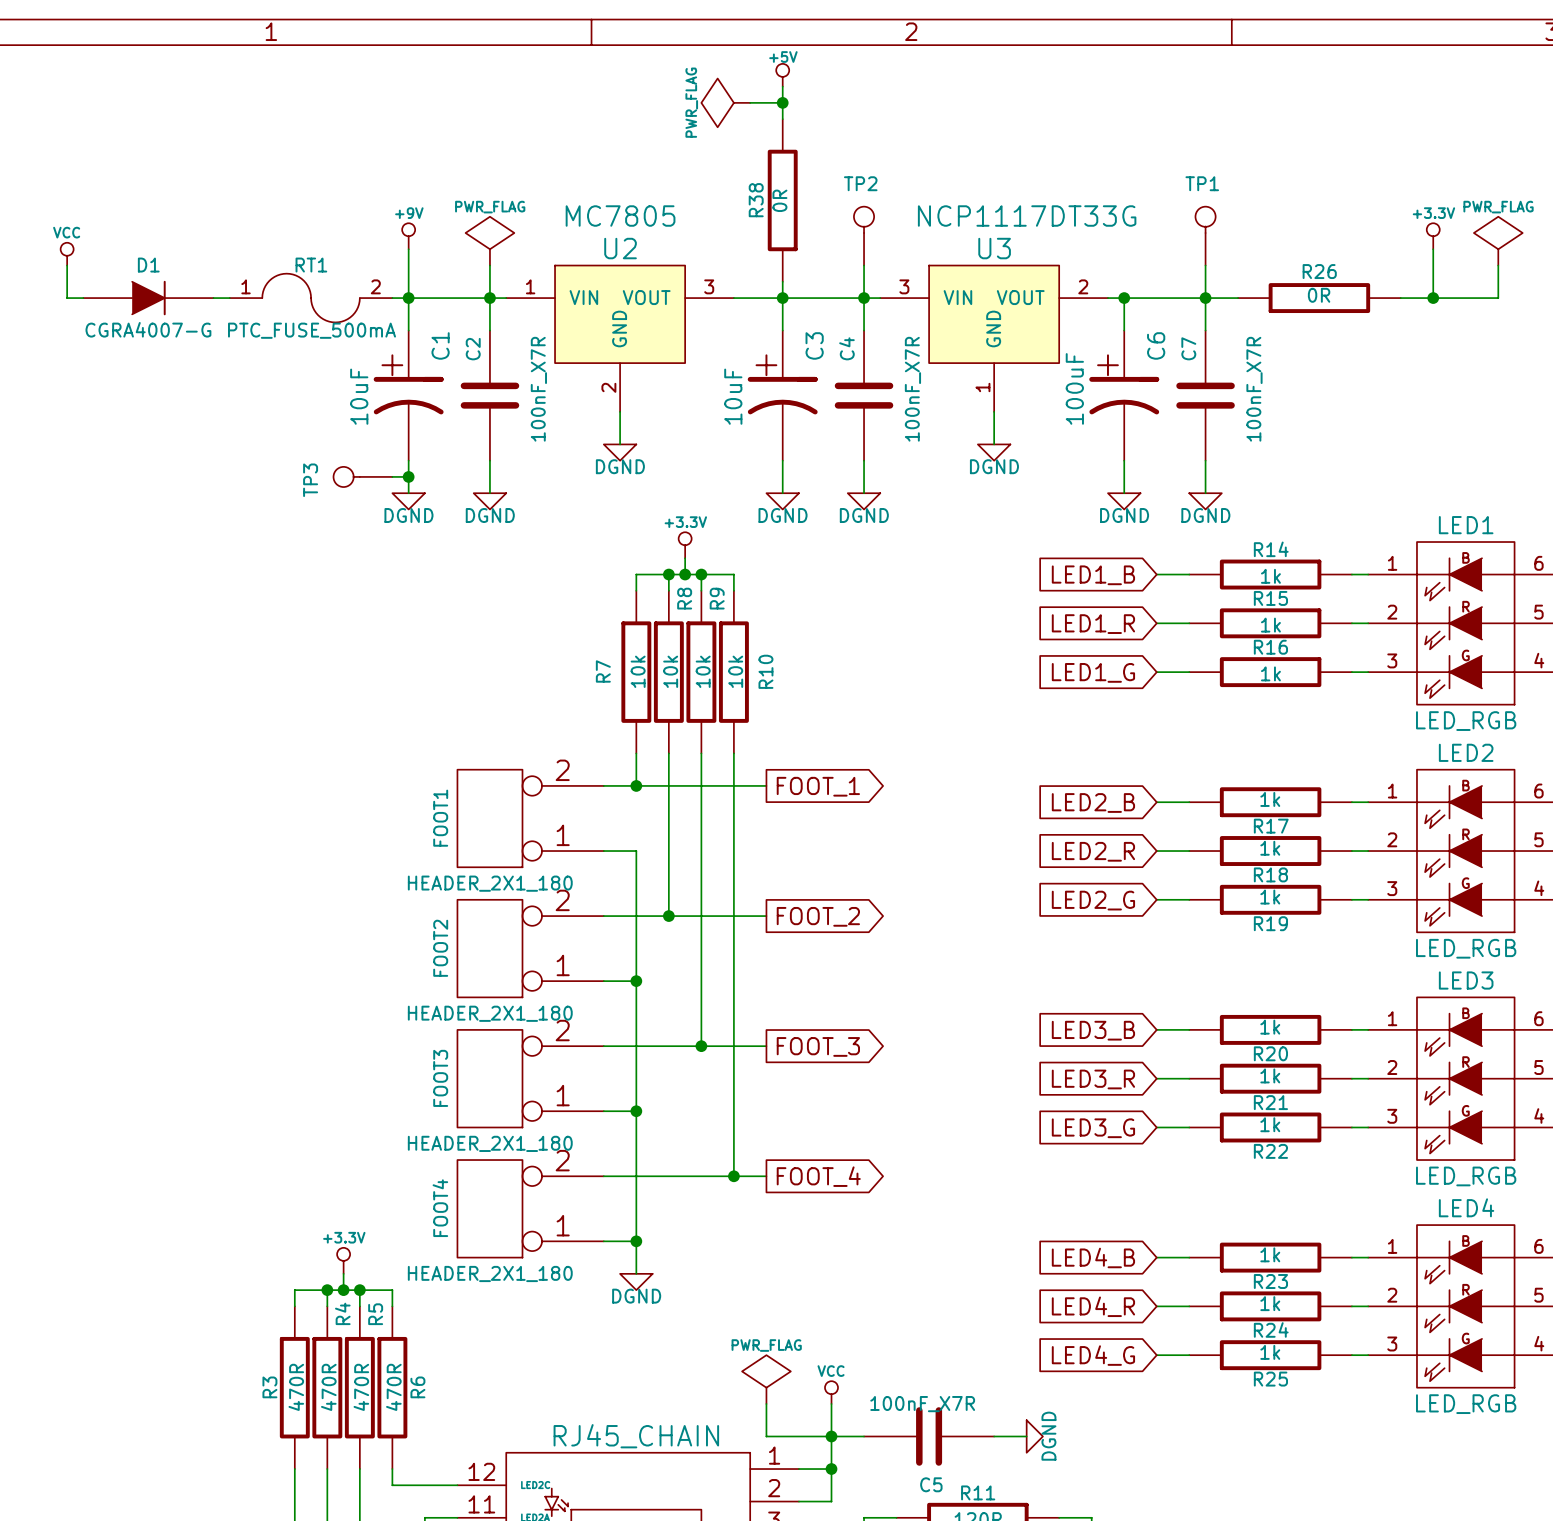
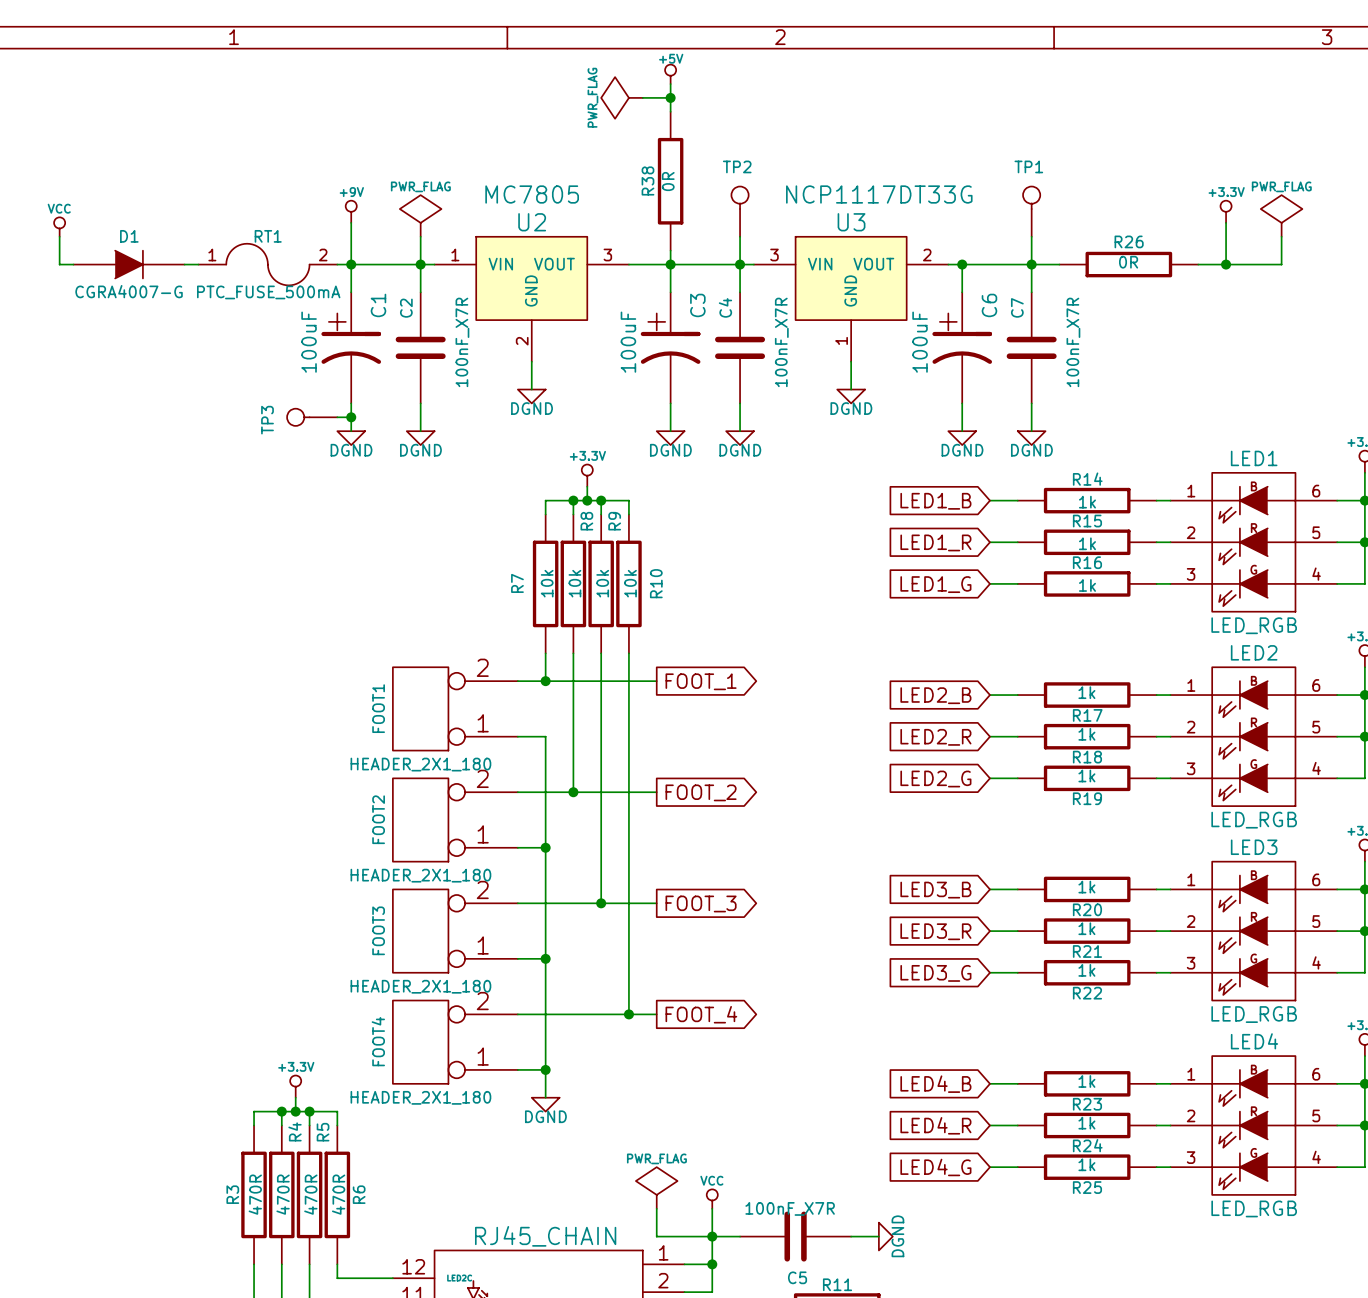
C1 value: 10uF (359, 396) -> 100uF (309, 342)
C3 value: 10uF (733, 396) -> 100uF (628, 342)

